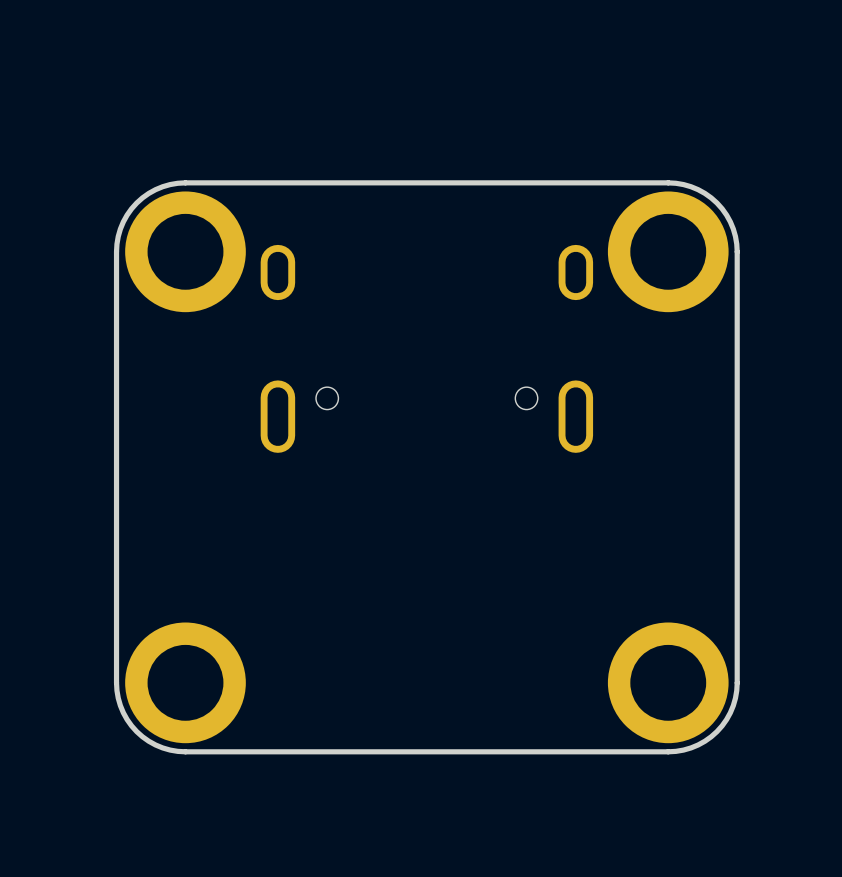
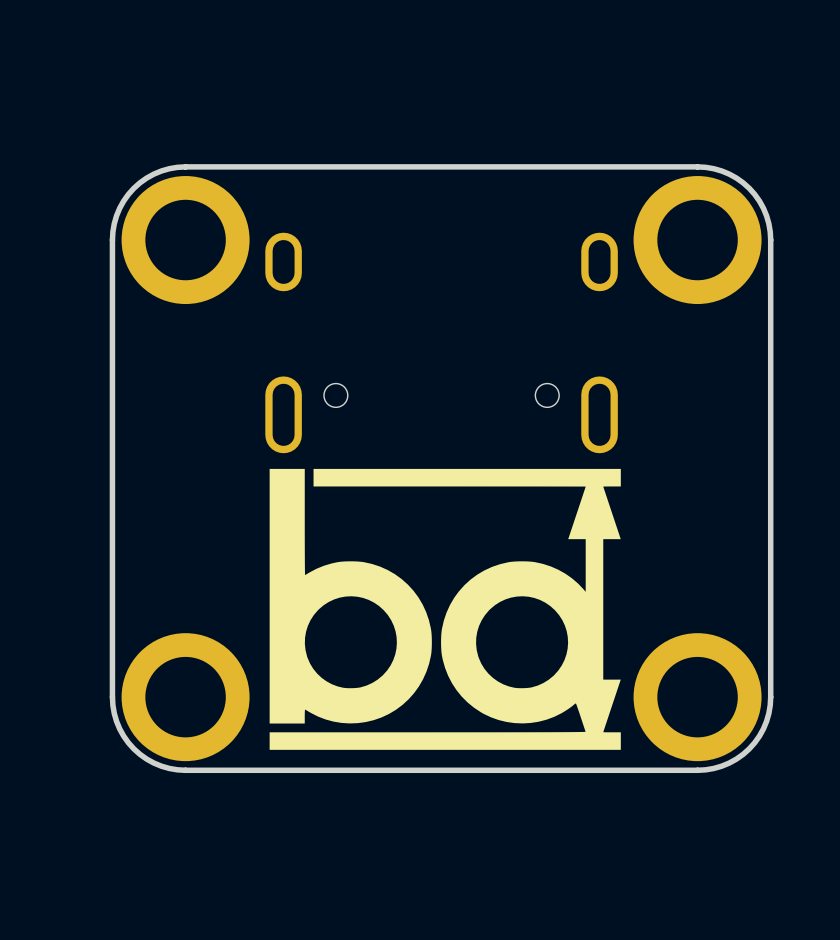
drawing: none -> [269, 468, 621, 750]

